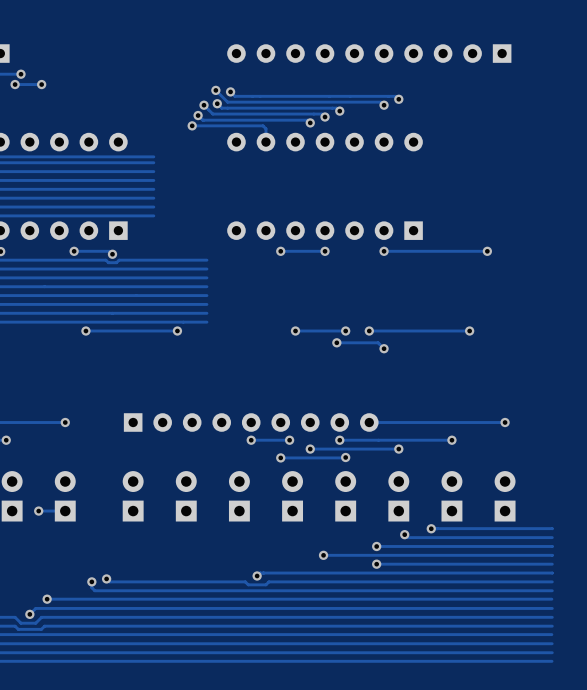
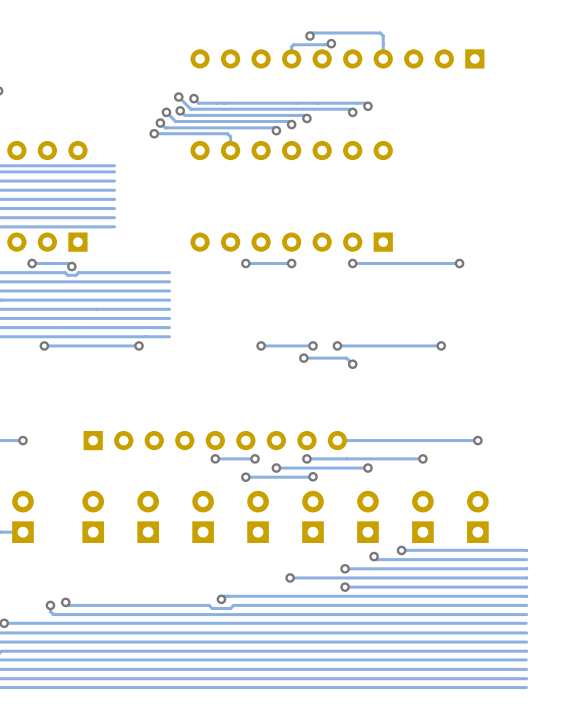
track: none -> (309, 36) (313, 32) (380, 32) (383, 36) (383, 58)
via: none -> (309, 36)
track: none -> (331, 43) (293, 44) (291, 46) (291, 58)
via: none -> (331, 43)

